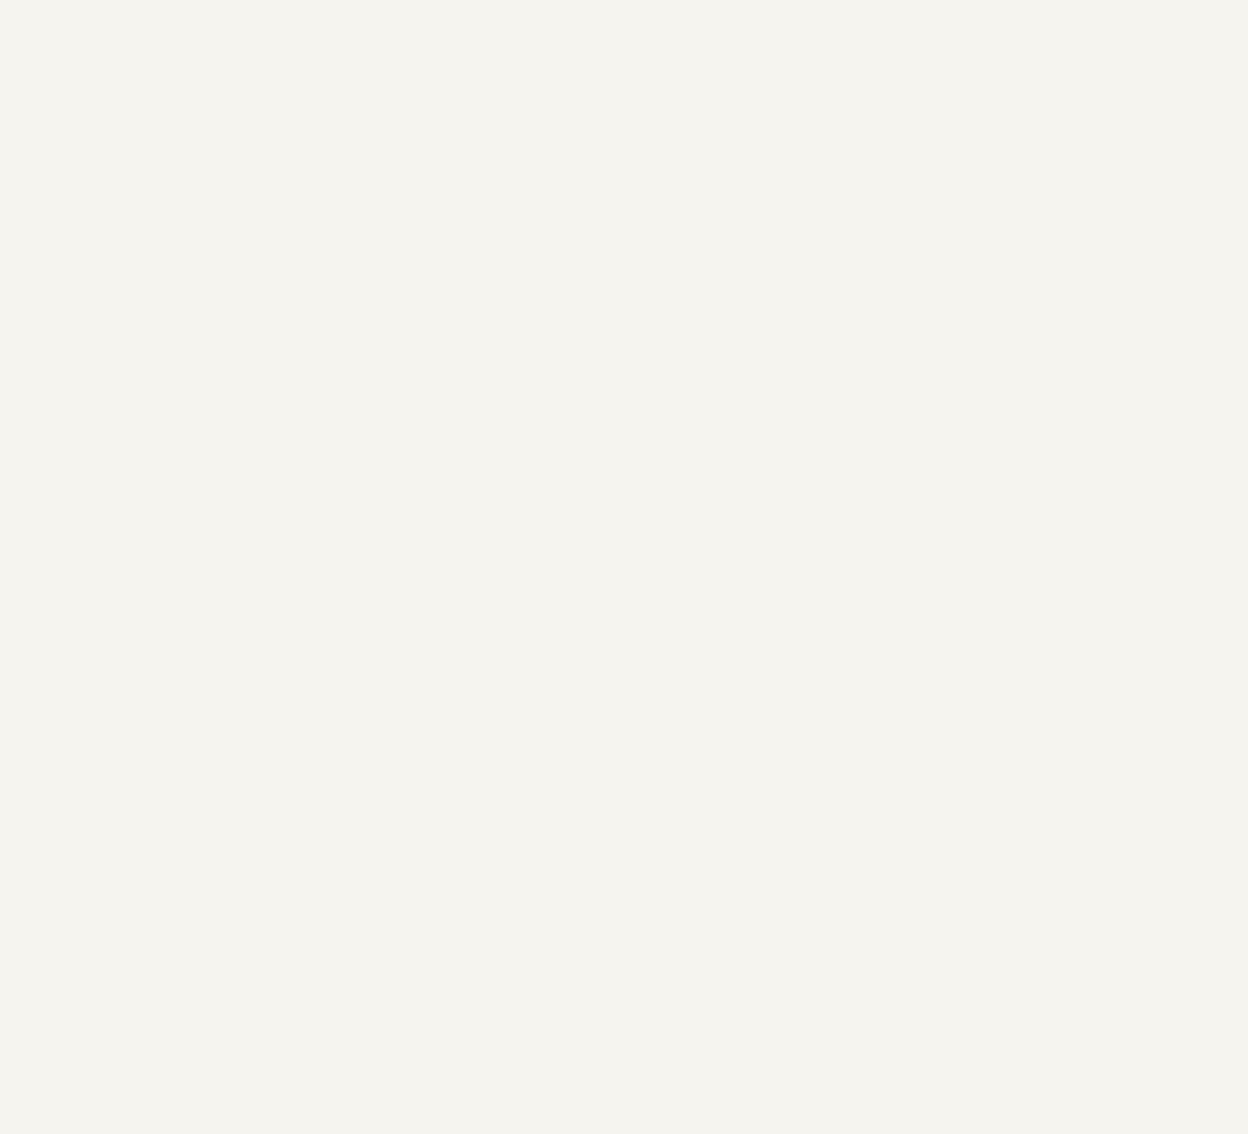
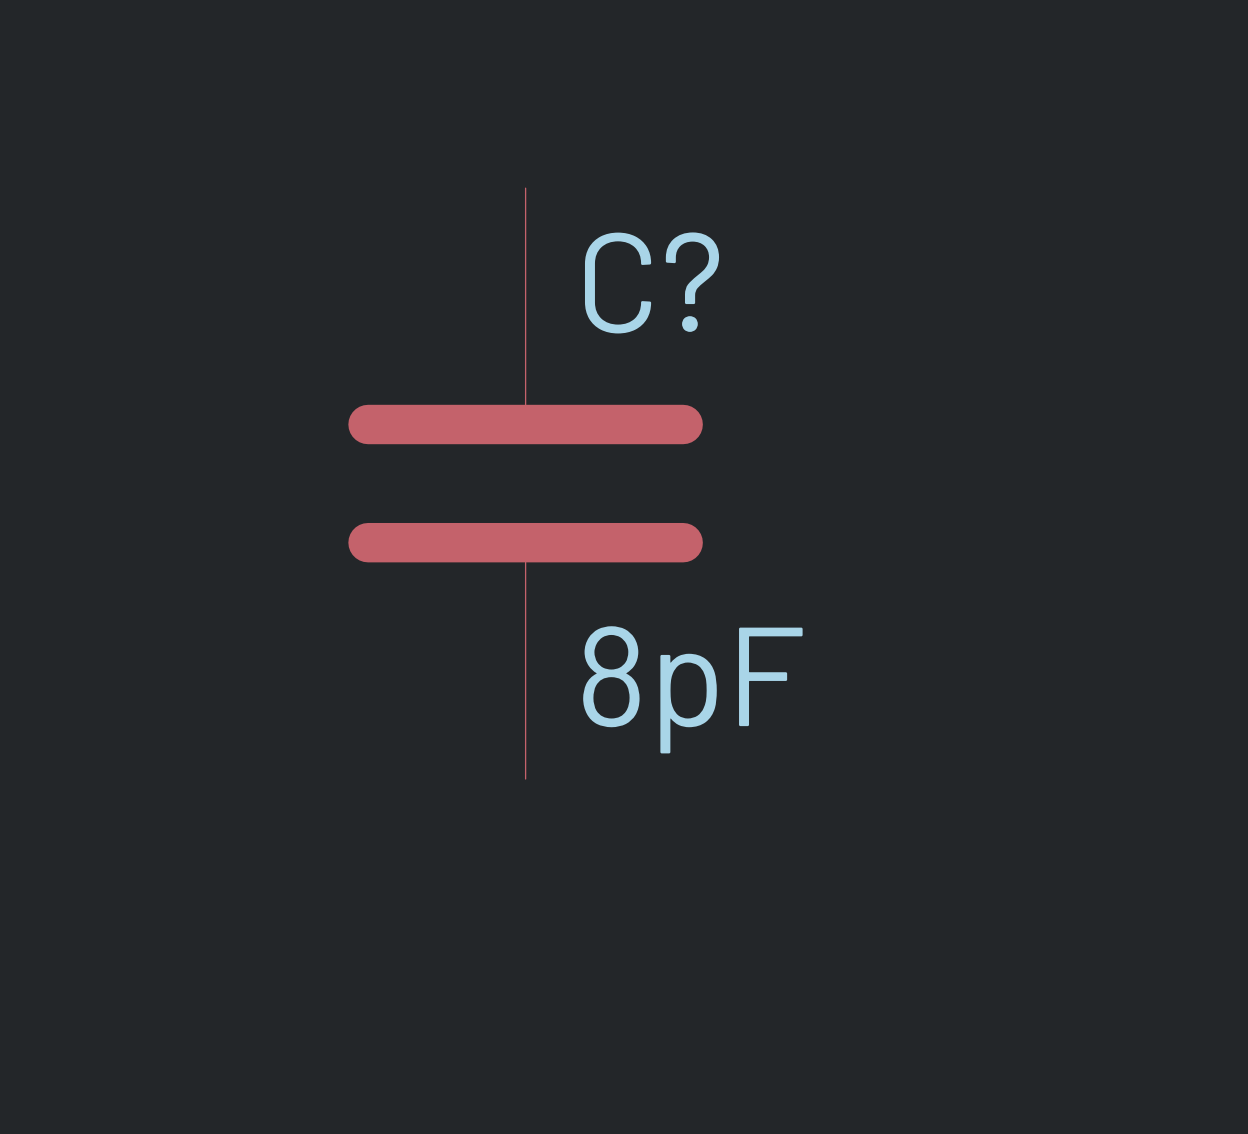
C?: none -> 8pF (525, 483)

